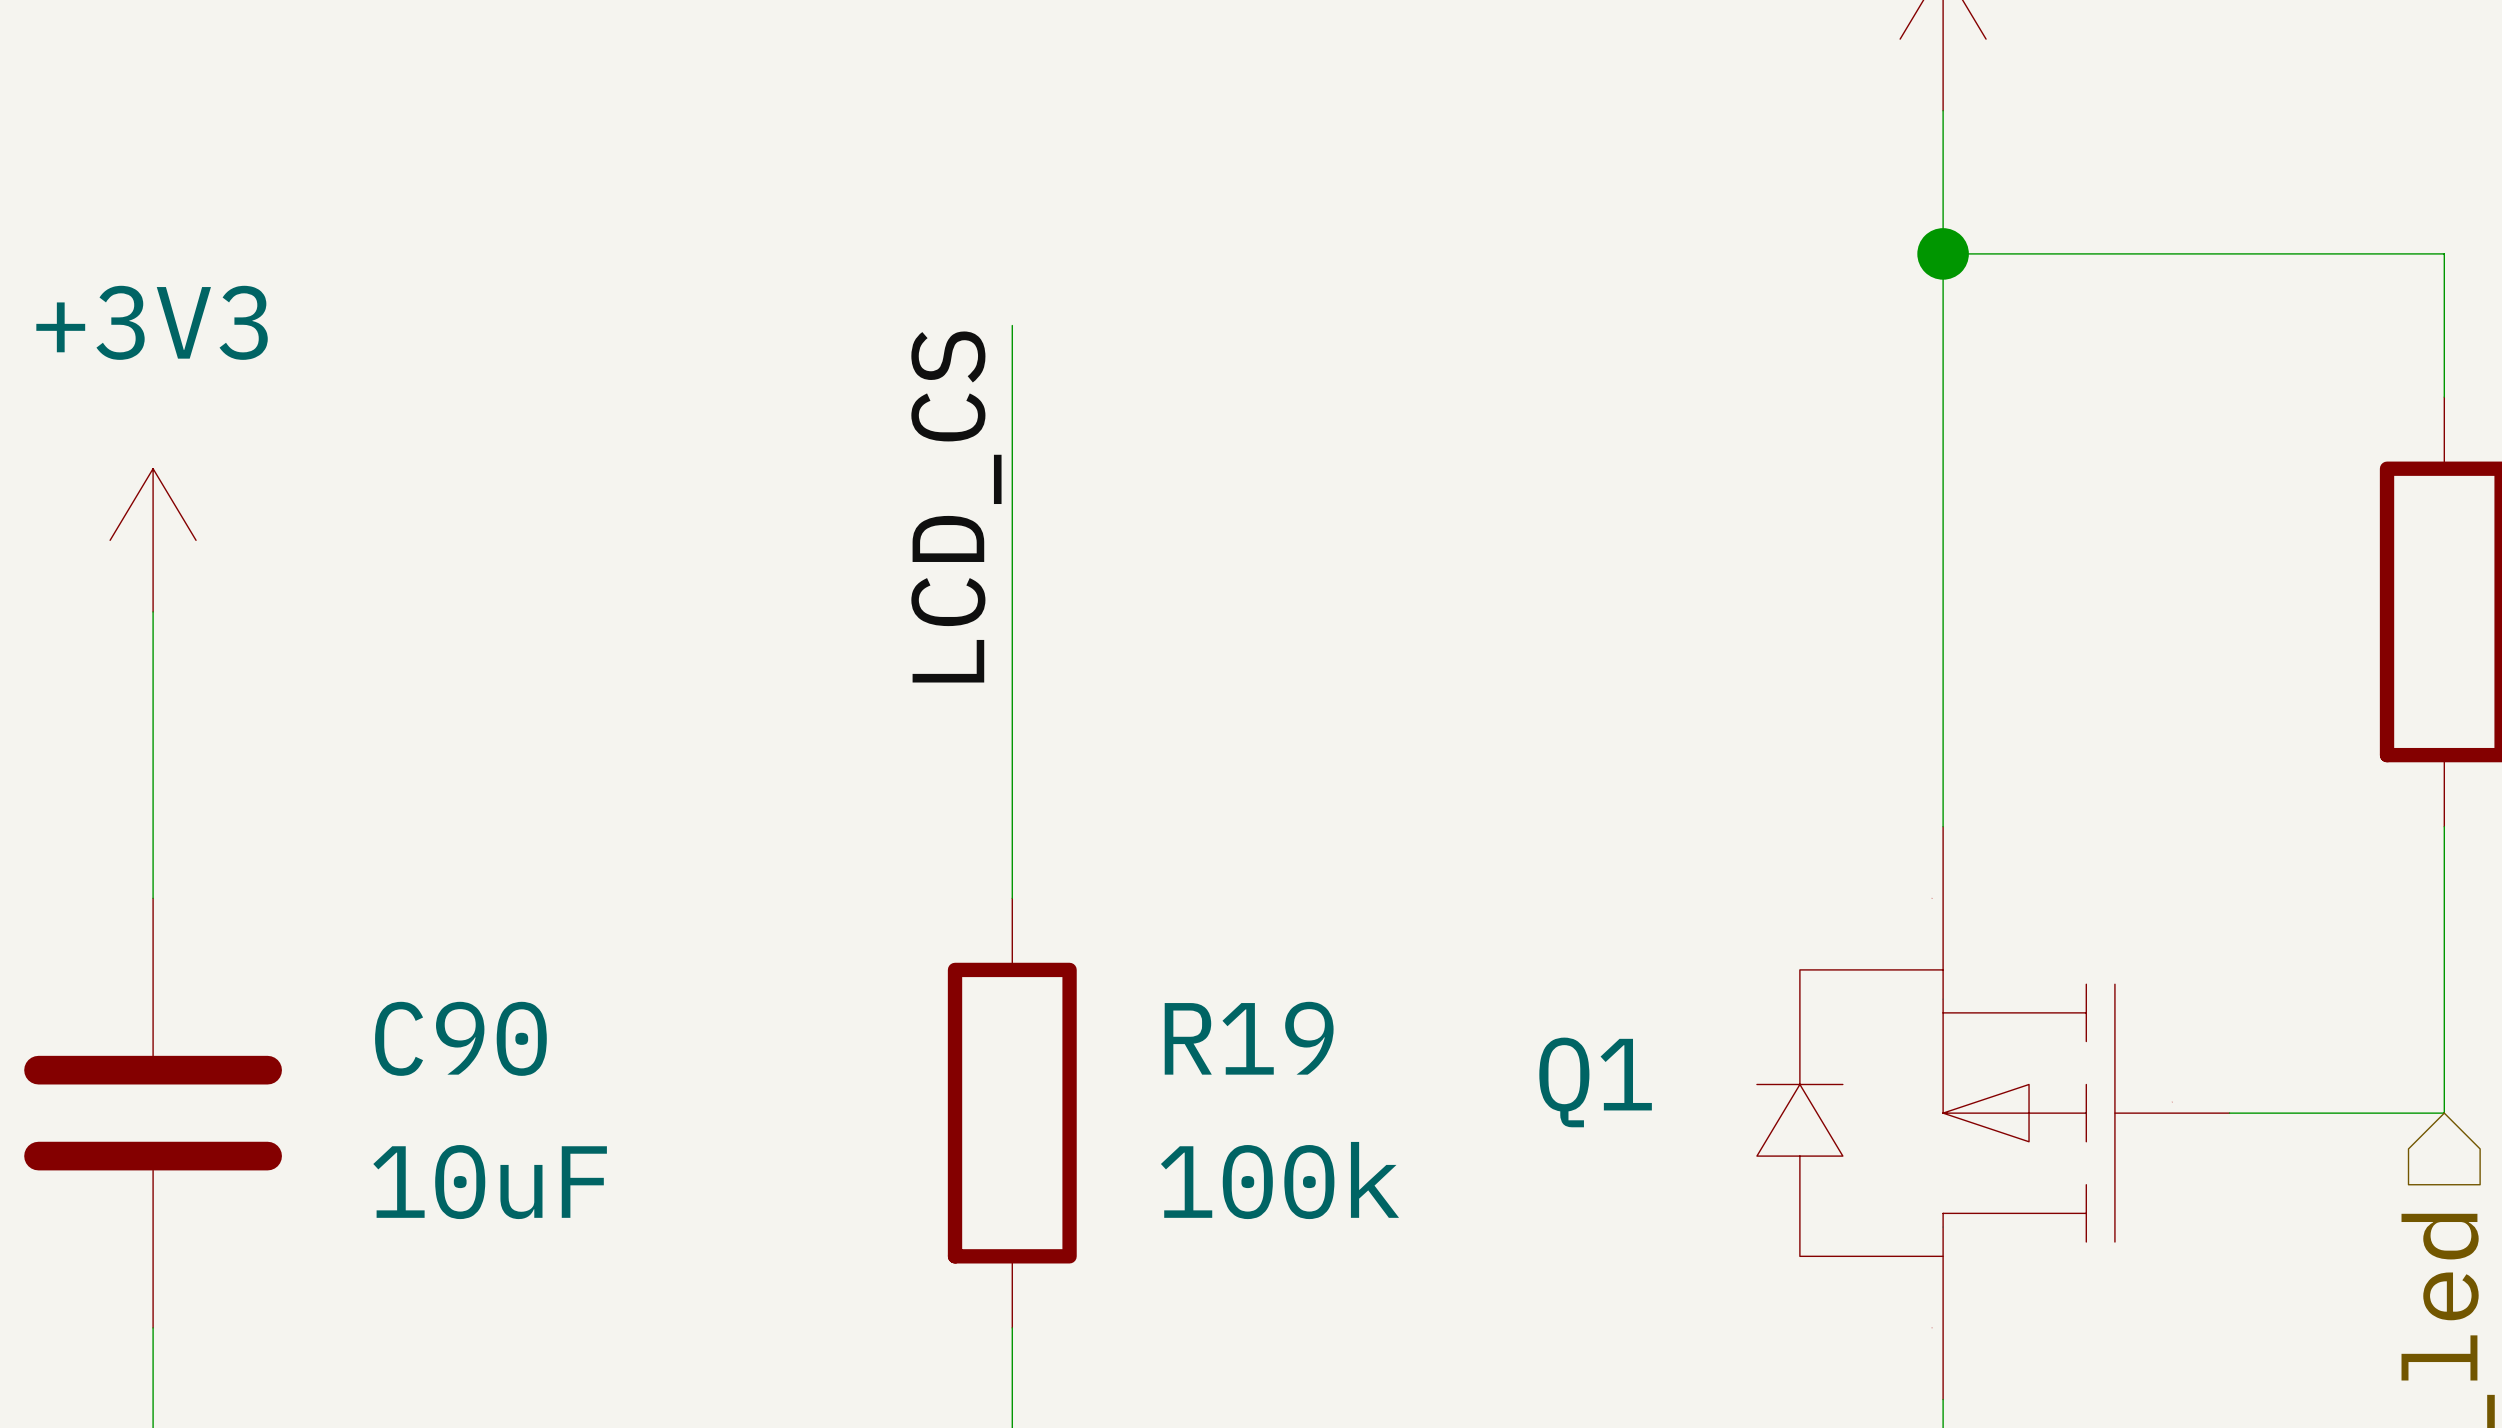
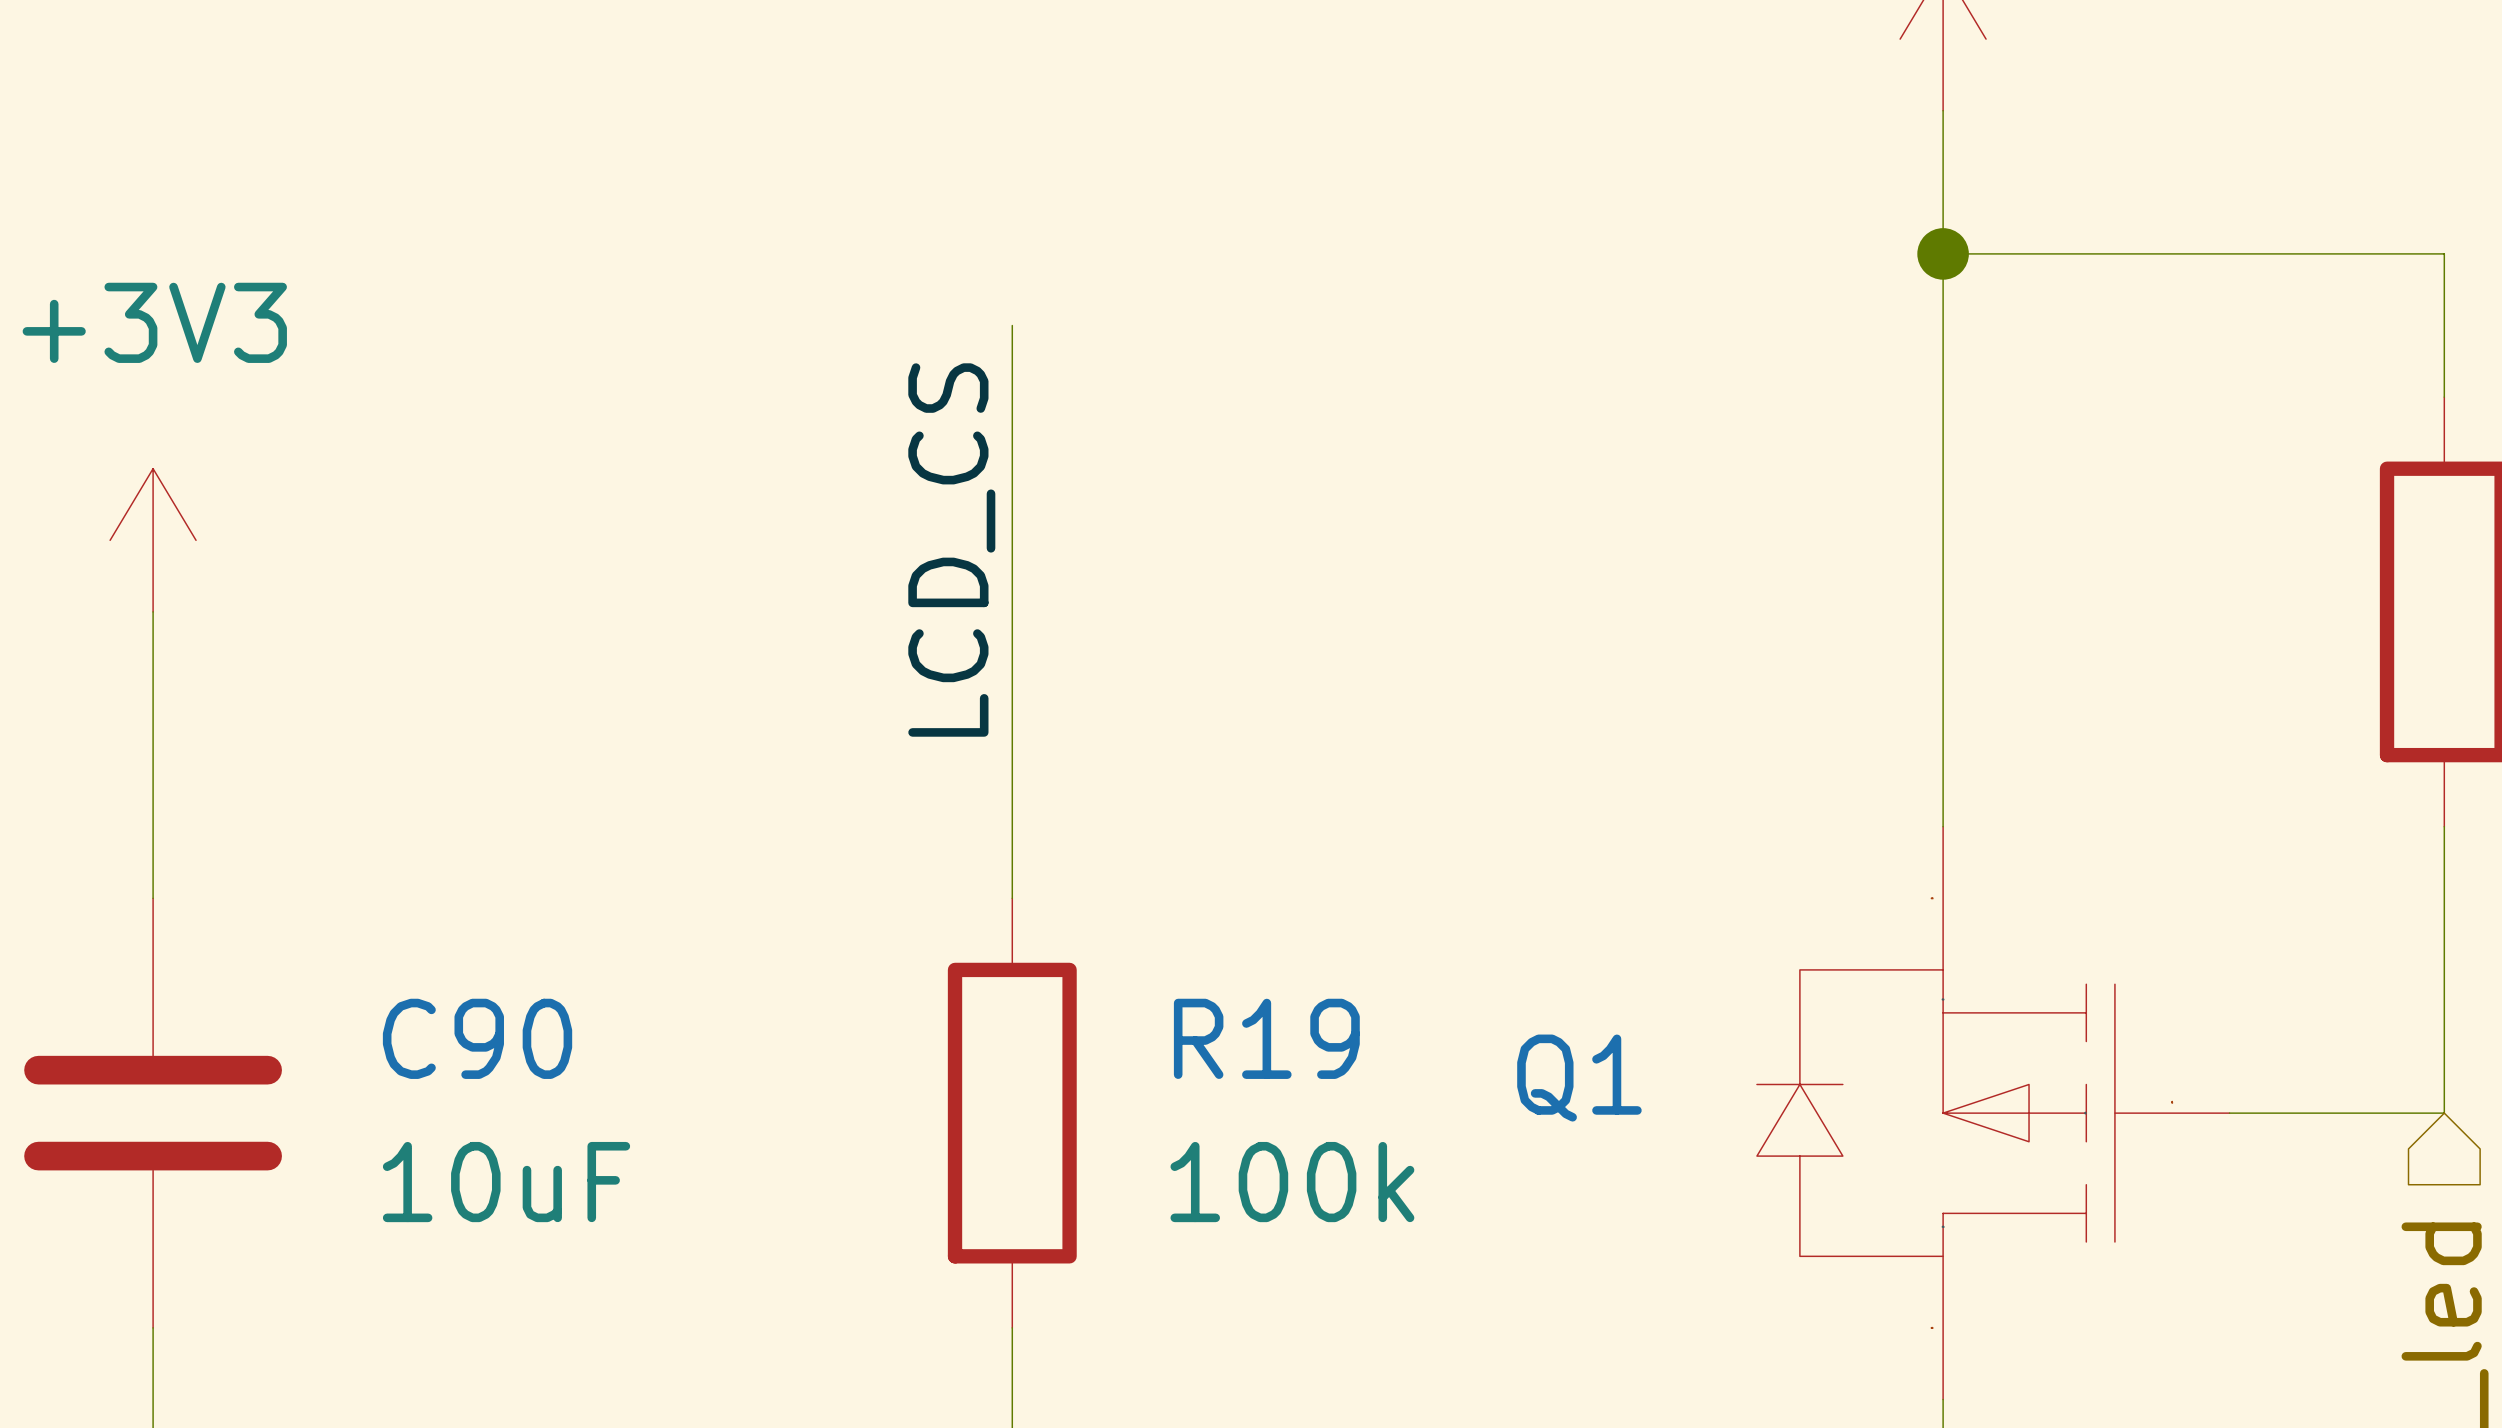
label position: LCD_CS (956, 506) -> LCD_CS (951, 550)

